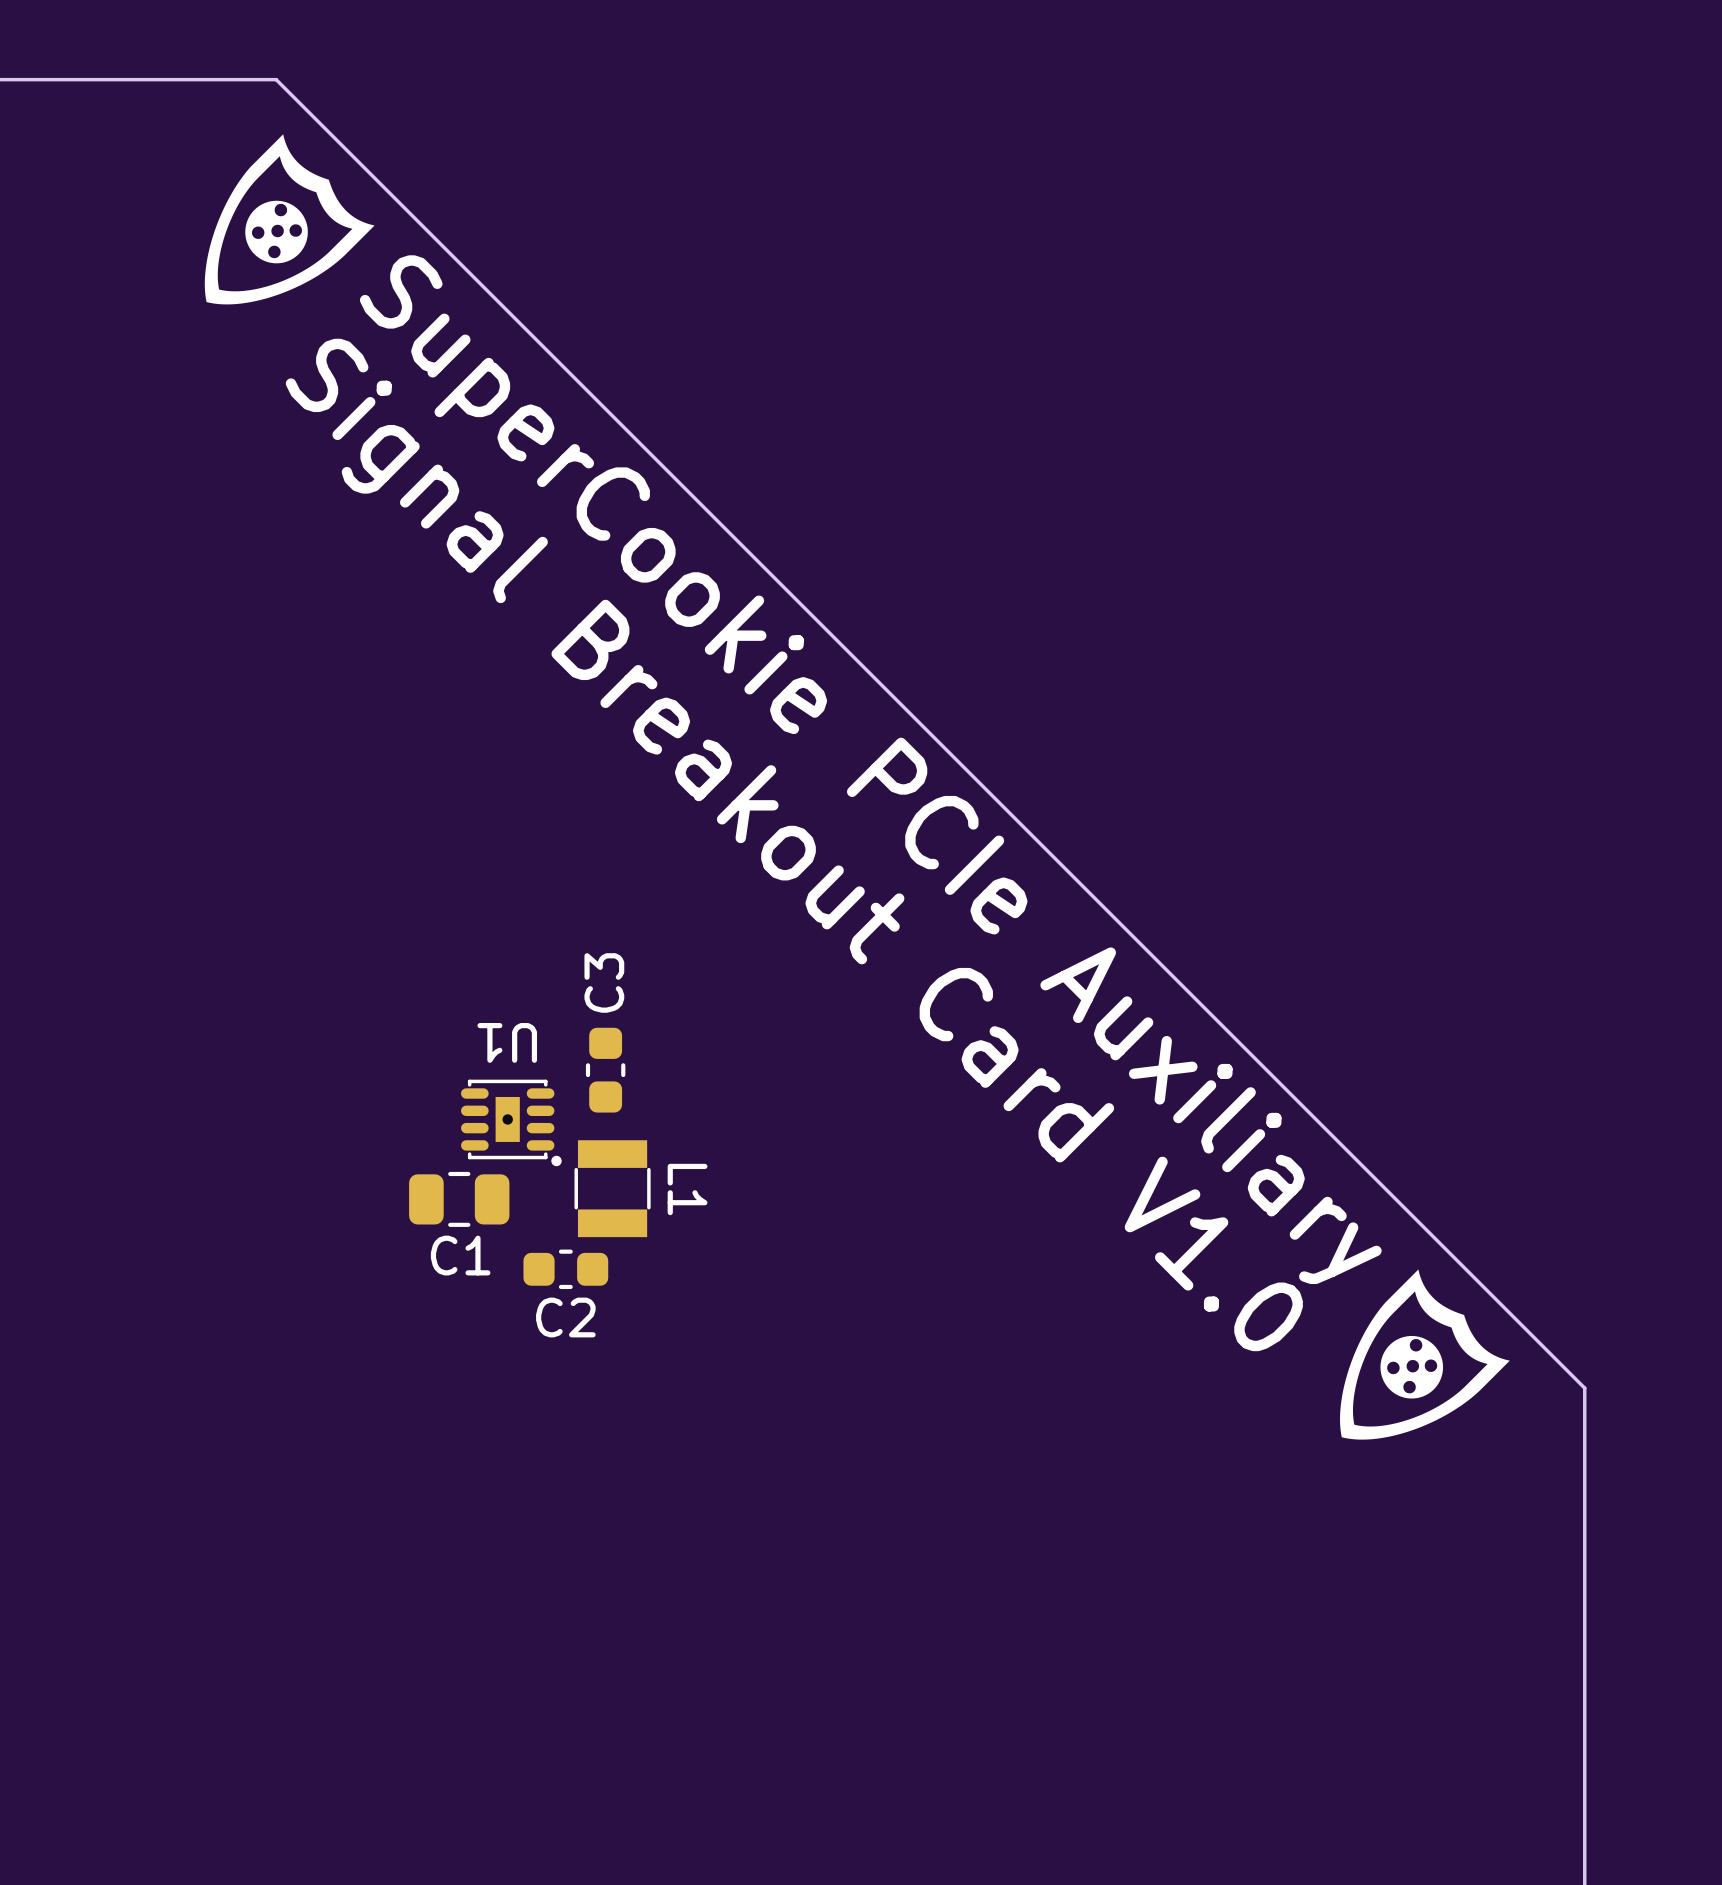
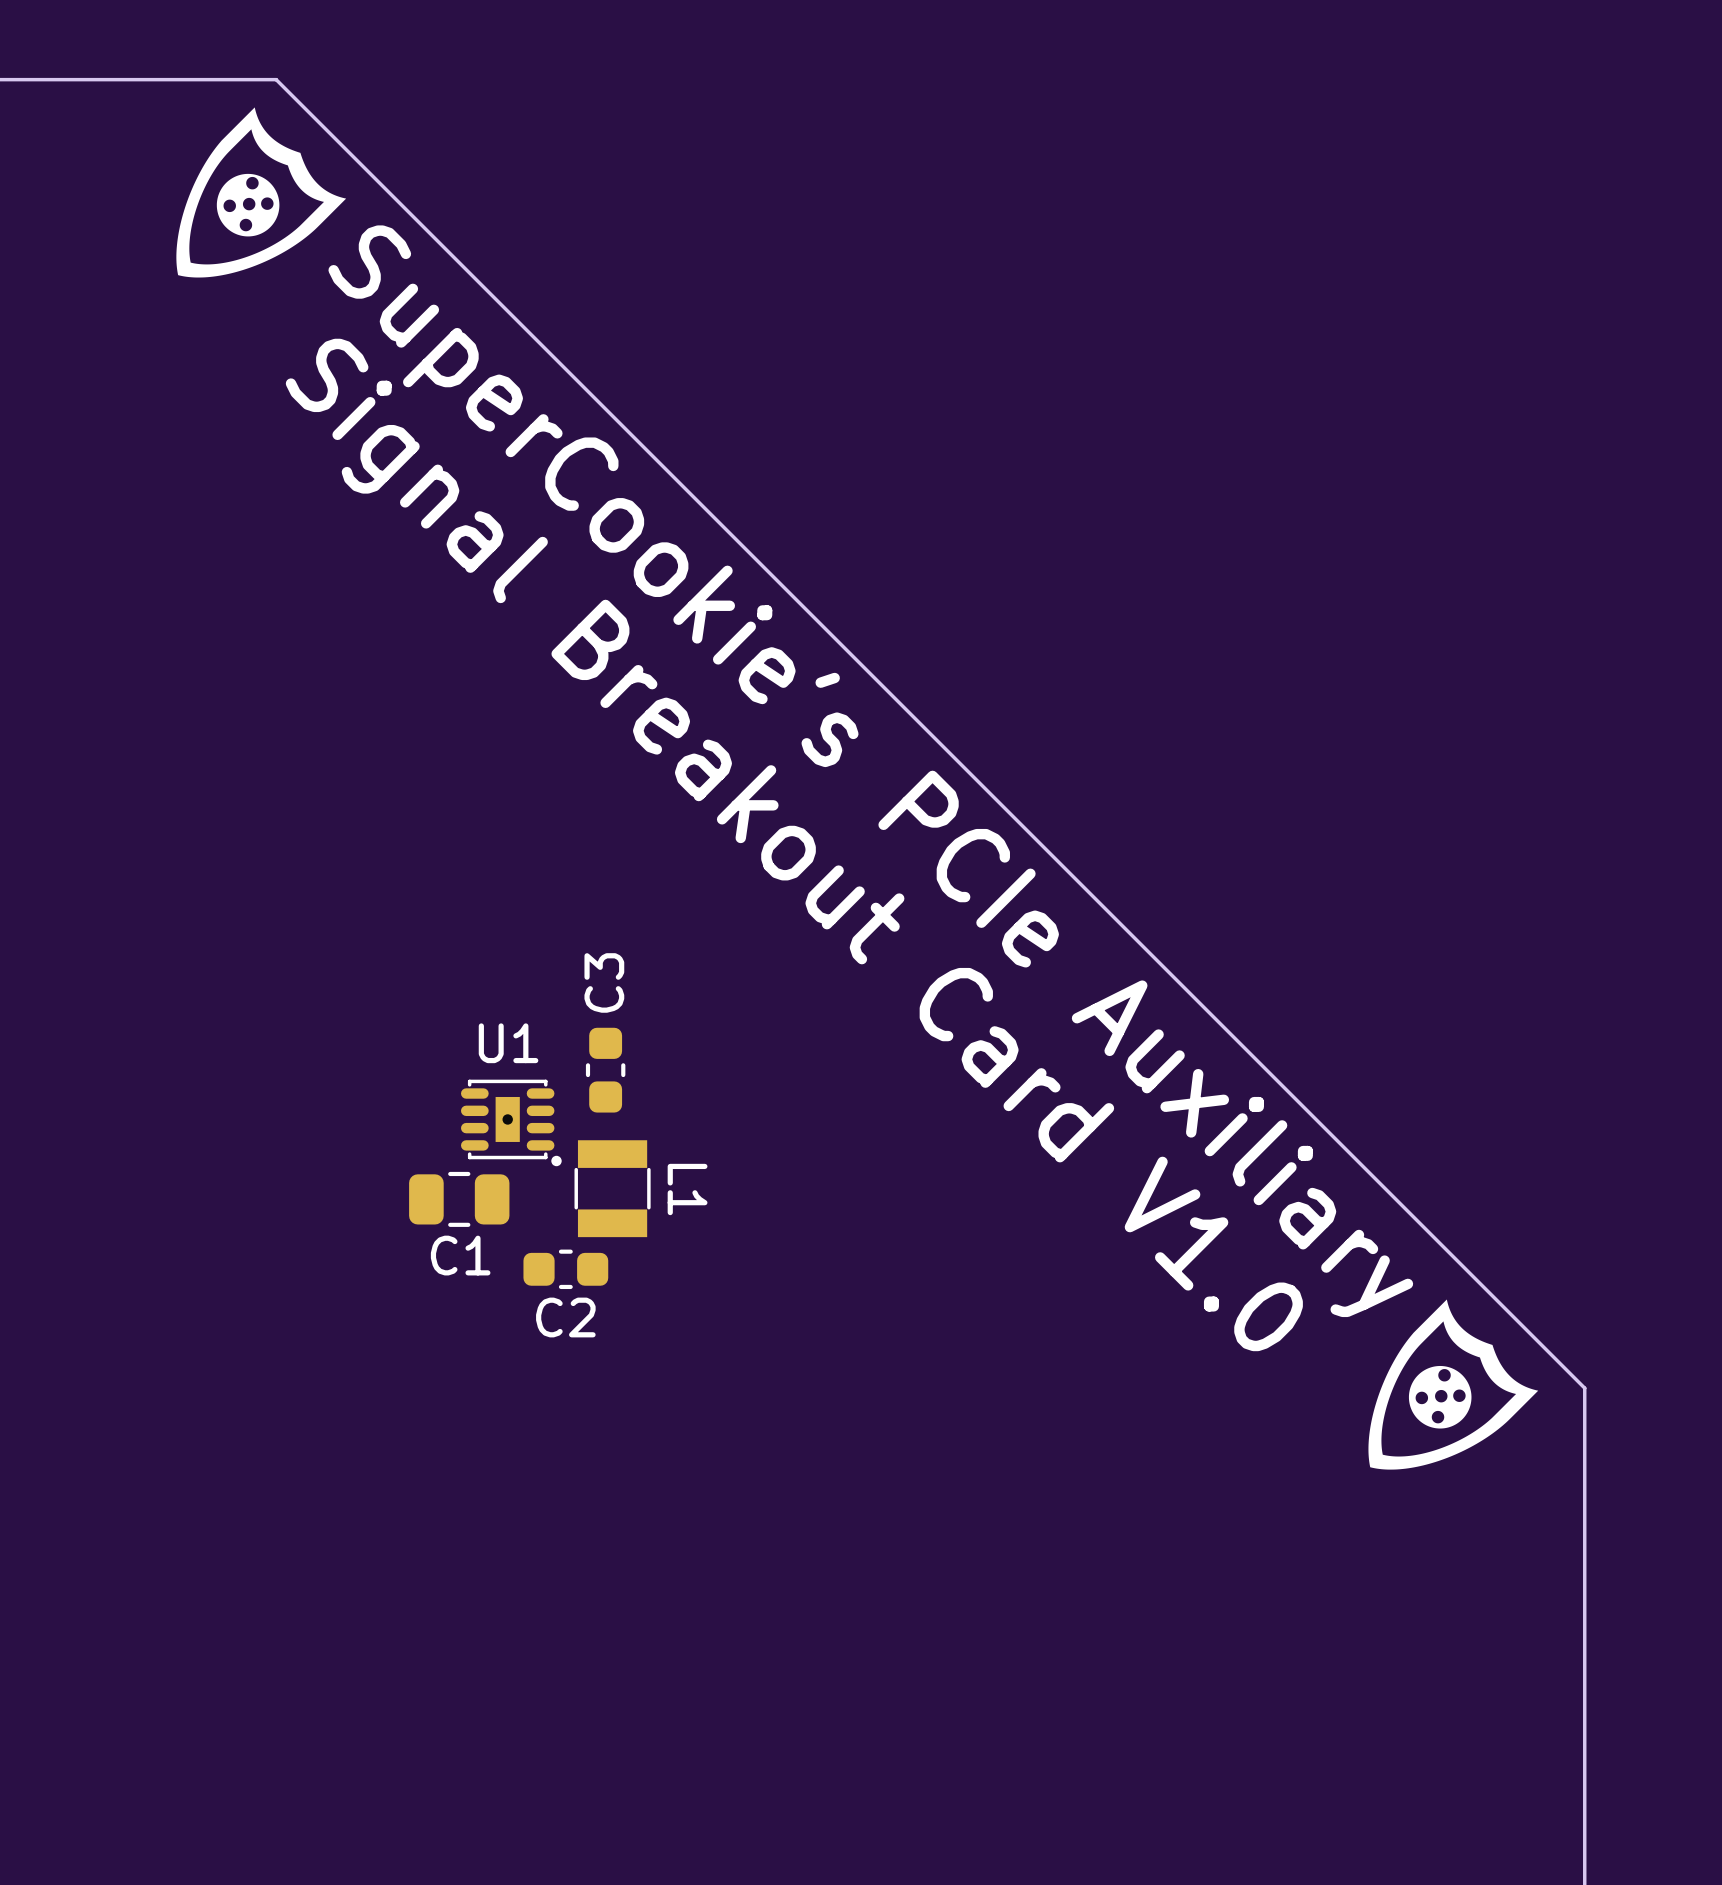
drawing position: (289, 219) -> (261, 192)
text: SuperCookie PCIe Auxiliary (870, 769) -> SuperCookie's PCIe Auxiliary (870, 771)
U1 name rotation: 0° (507, 1042) -> 180° (508, 1043)
drawing position: (1424, 1354) -> (1453, 1384)

